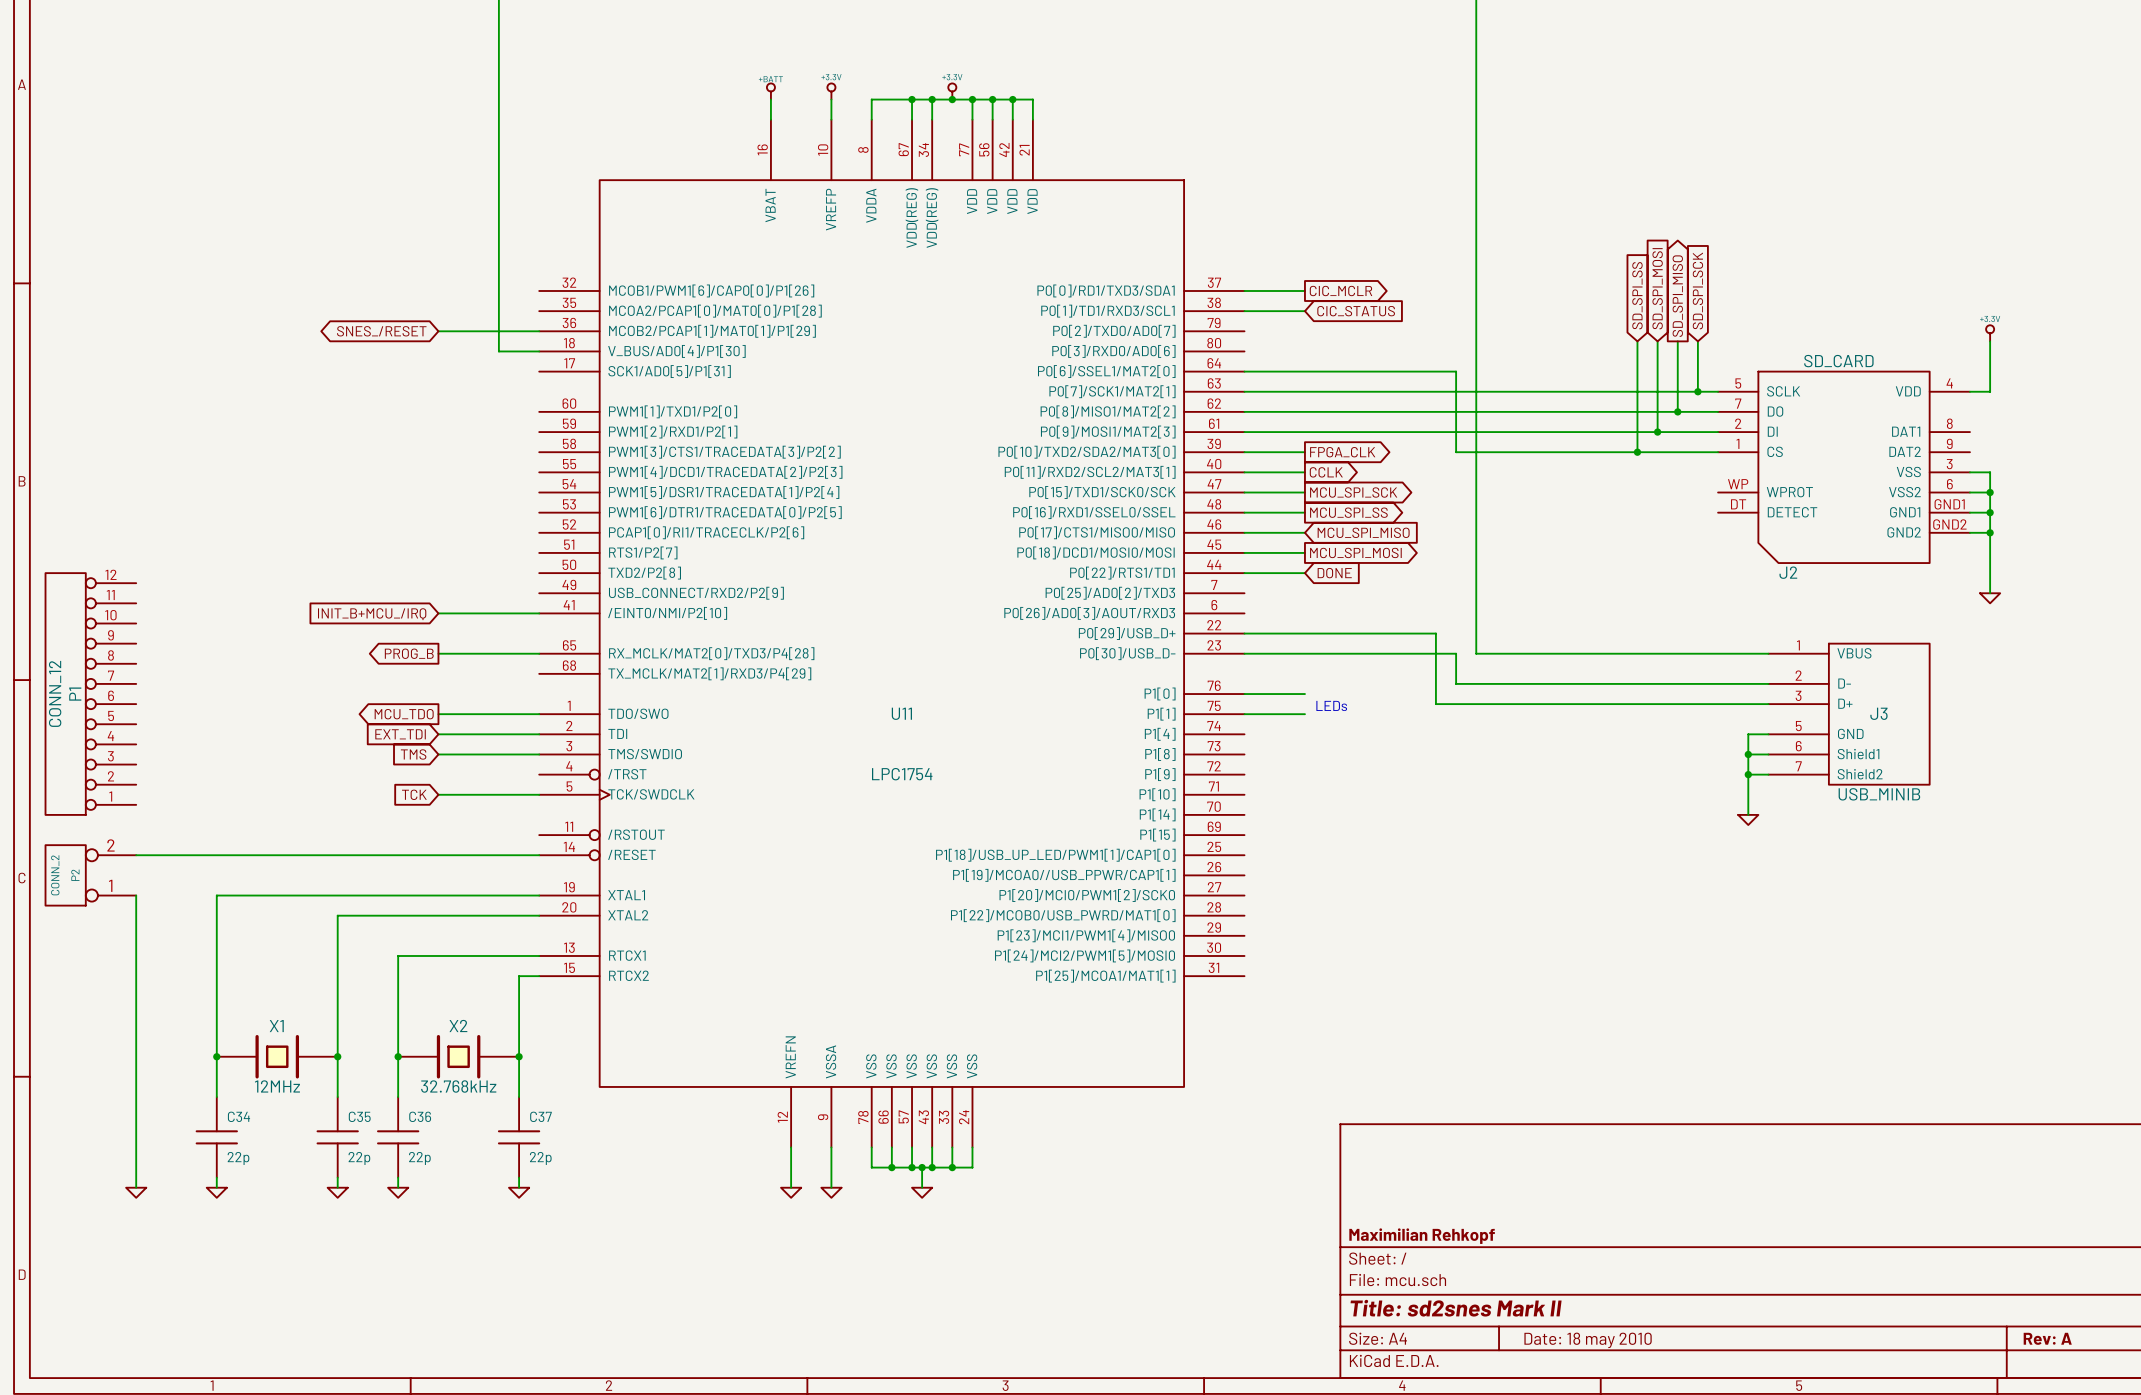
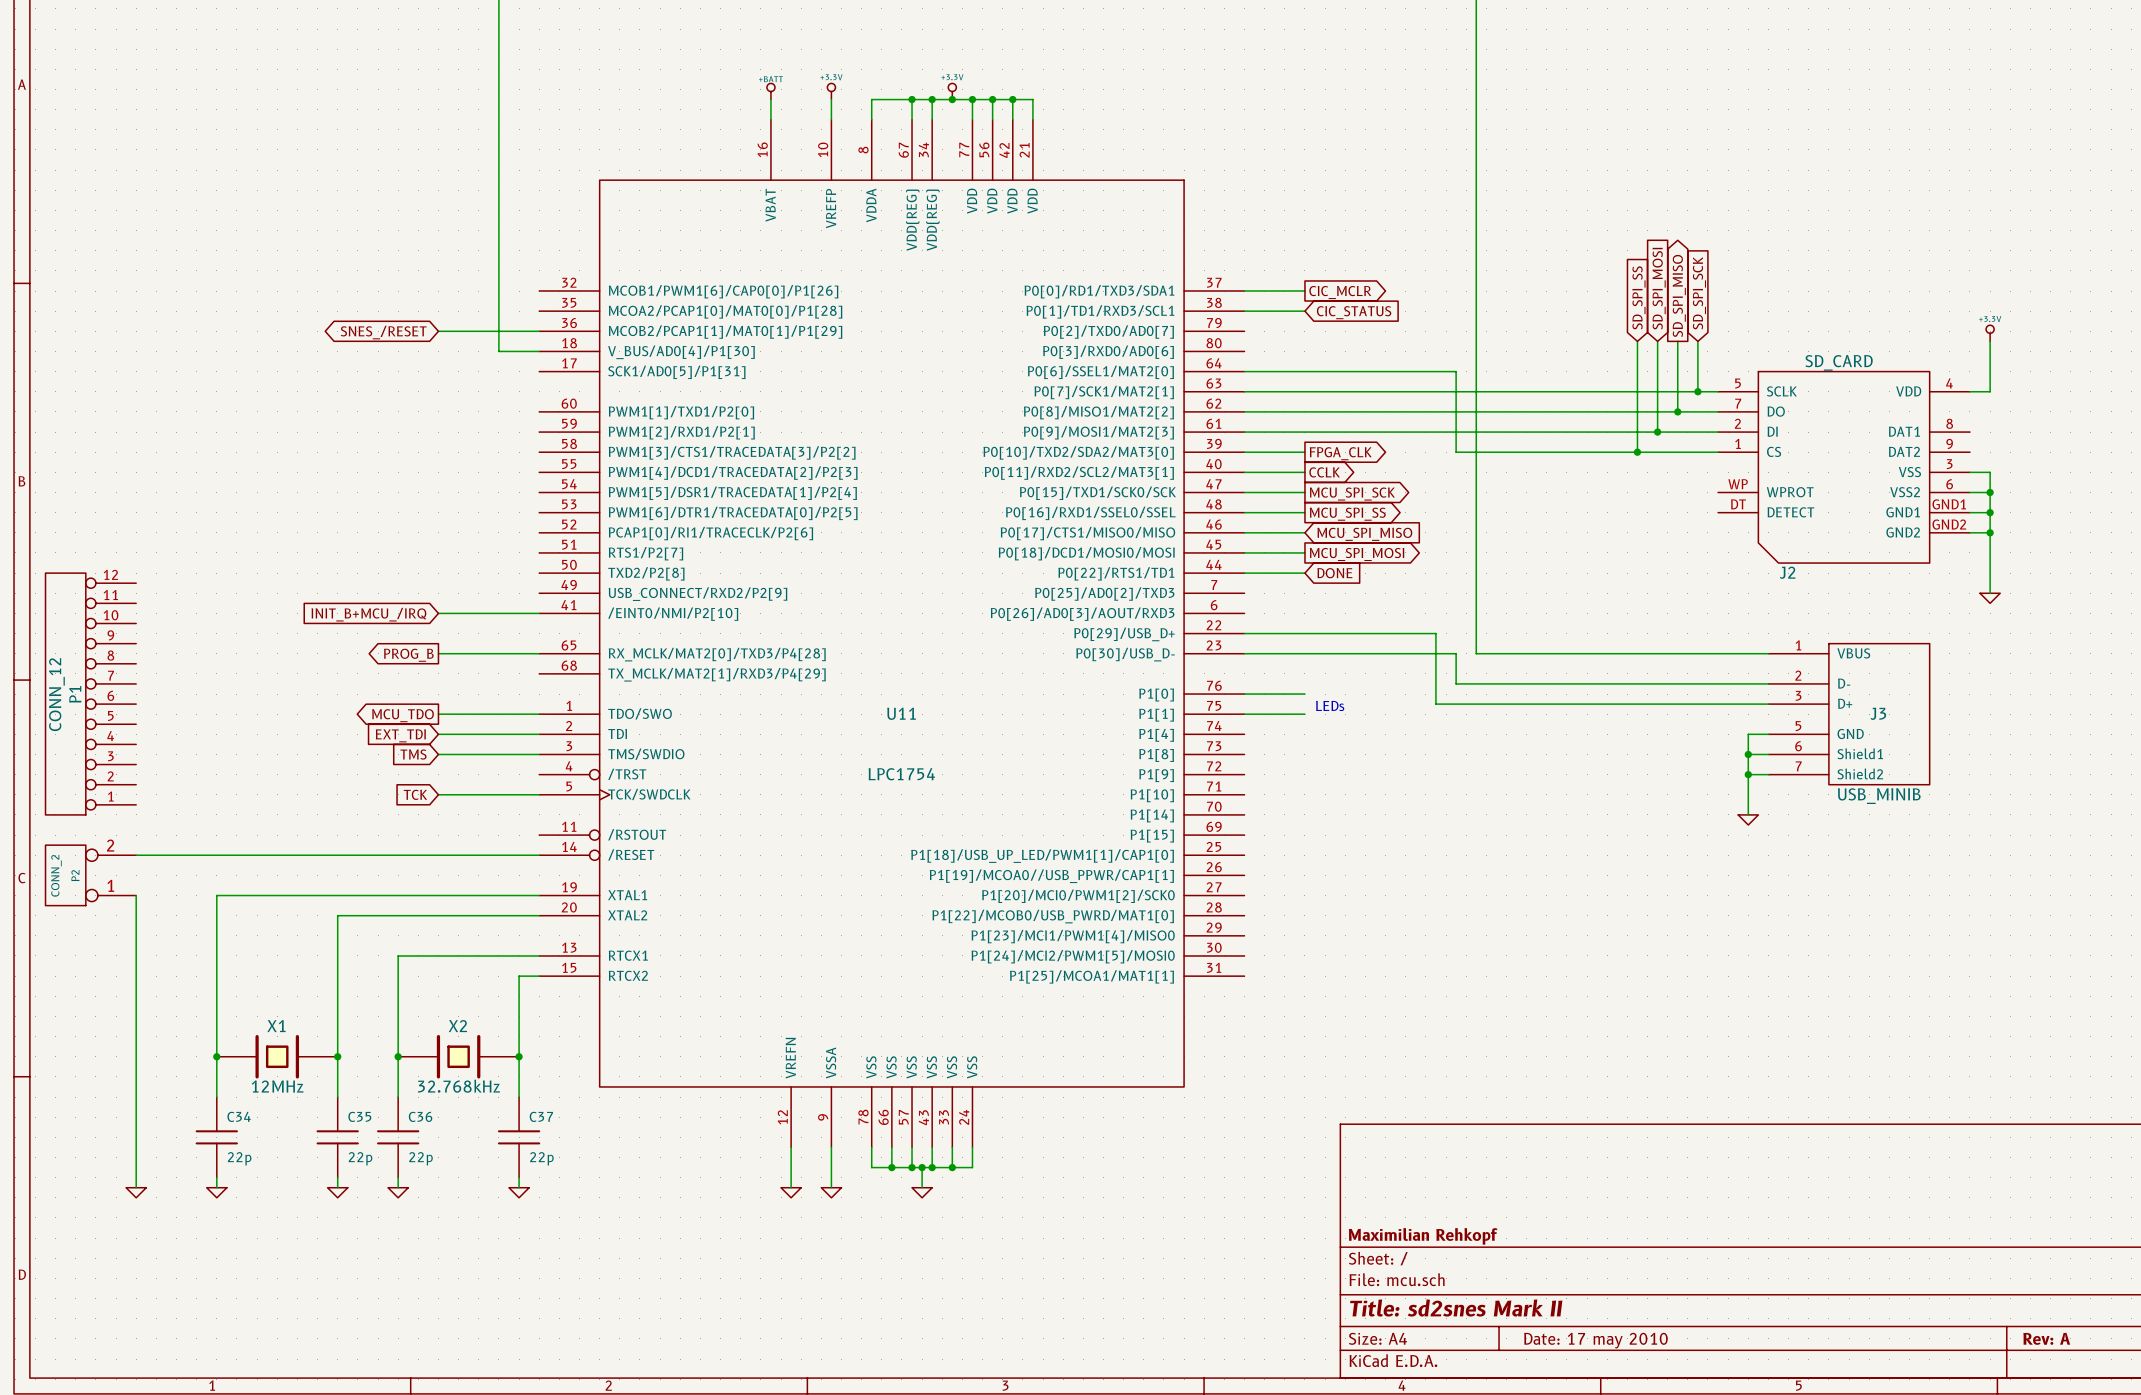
title block: Date: 18 may 2010 (1588, 1340) -> Date: 17 may 2010 (1595, 1340)

